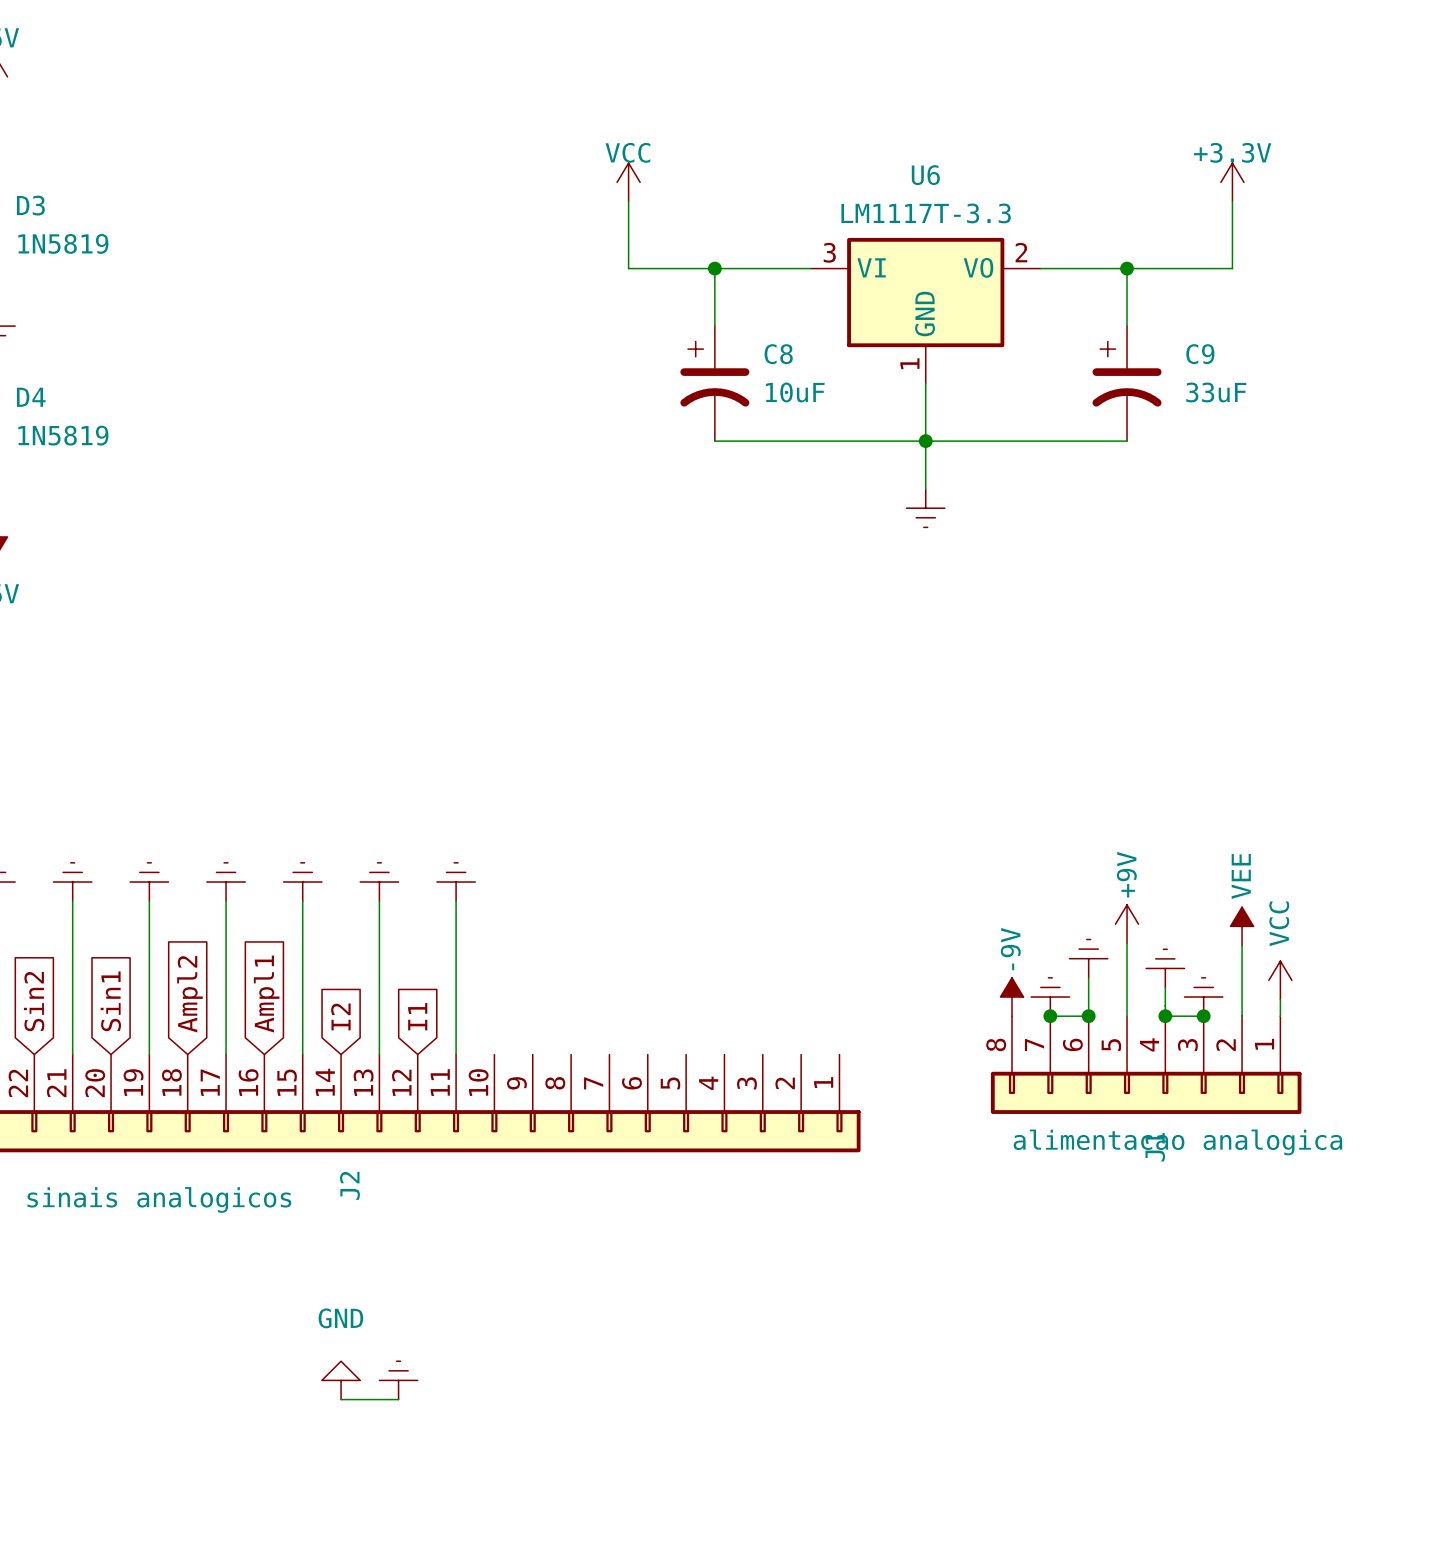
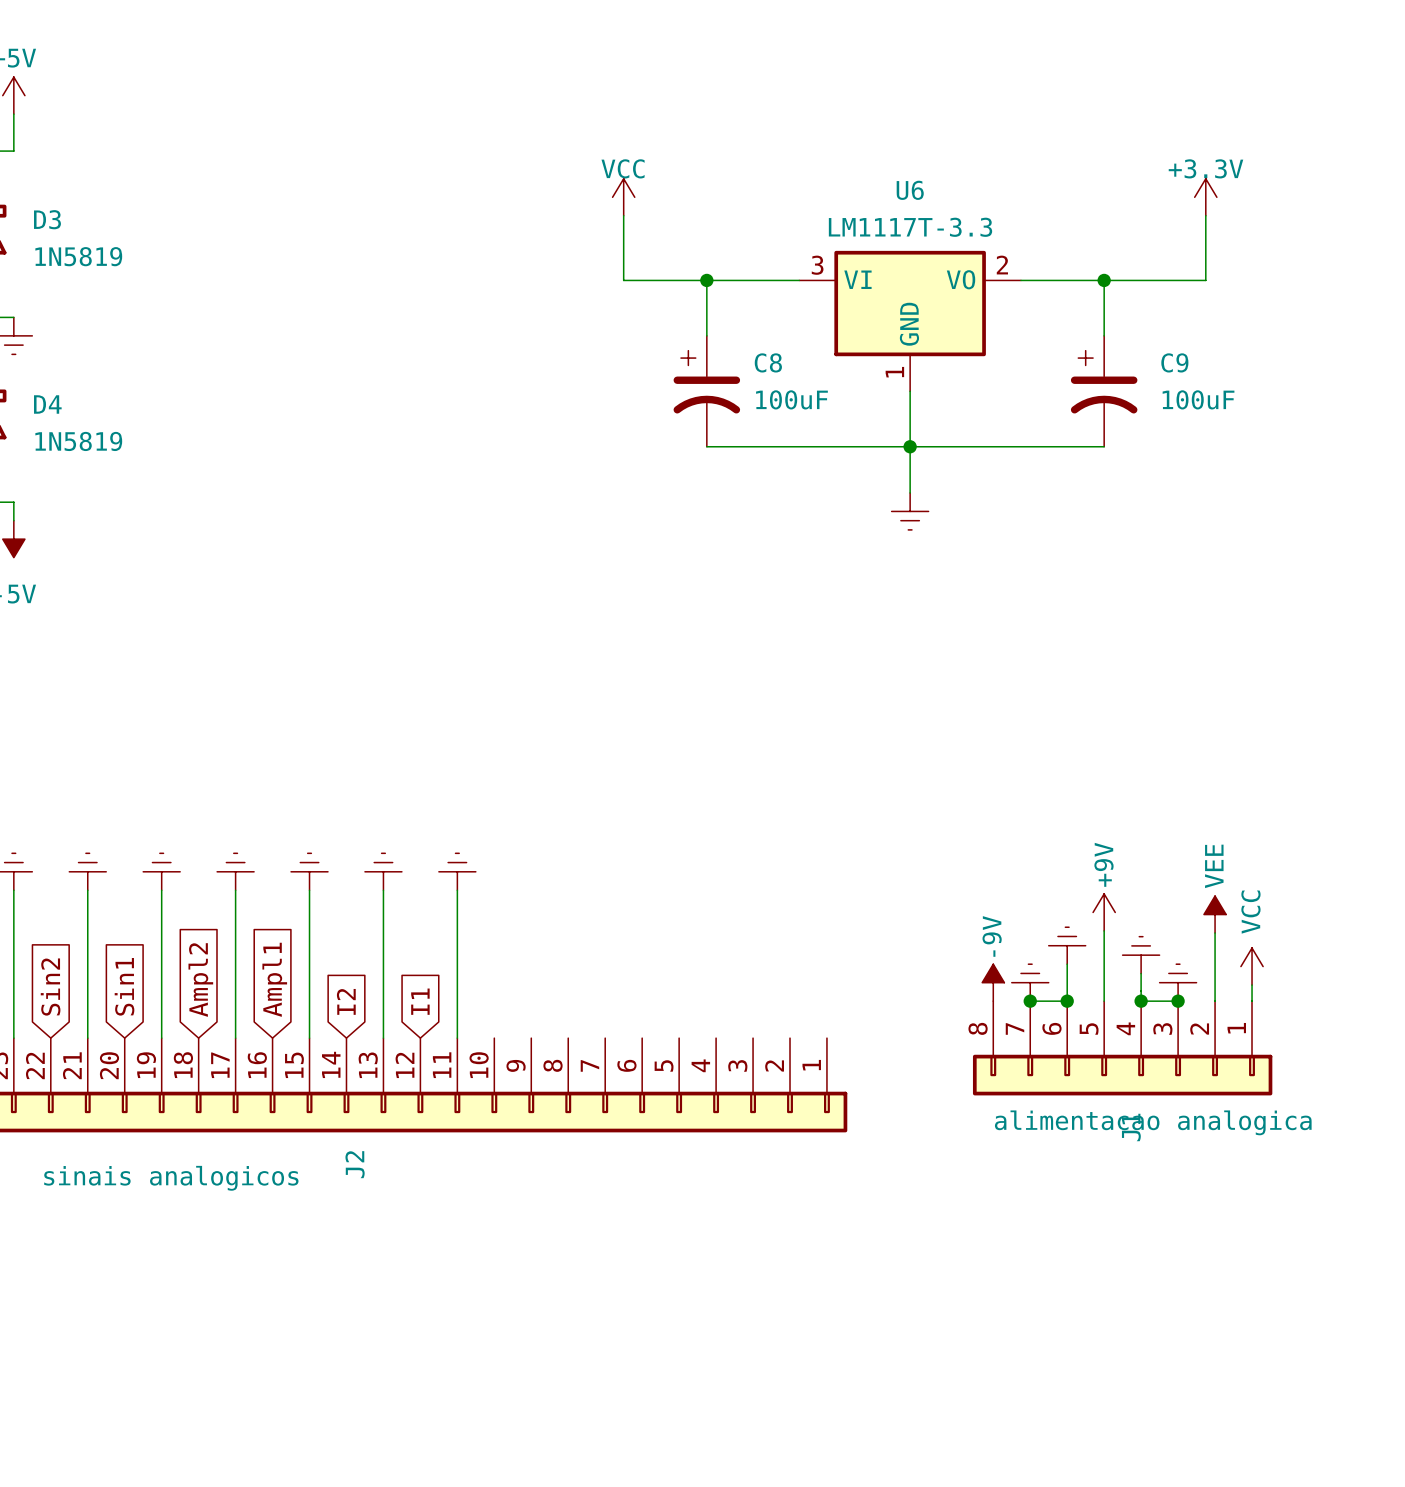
C8 value: 10uF (795, 392) -> 100uF (791, 399)
C9 value: 33uF (1216, 392) -> 100uF (1198, 399)
power symbol: GND (341, 1380) -> none
power symbol: (398, 1380) -> none
wire: (341, 1399) (398, 1399) -> none

